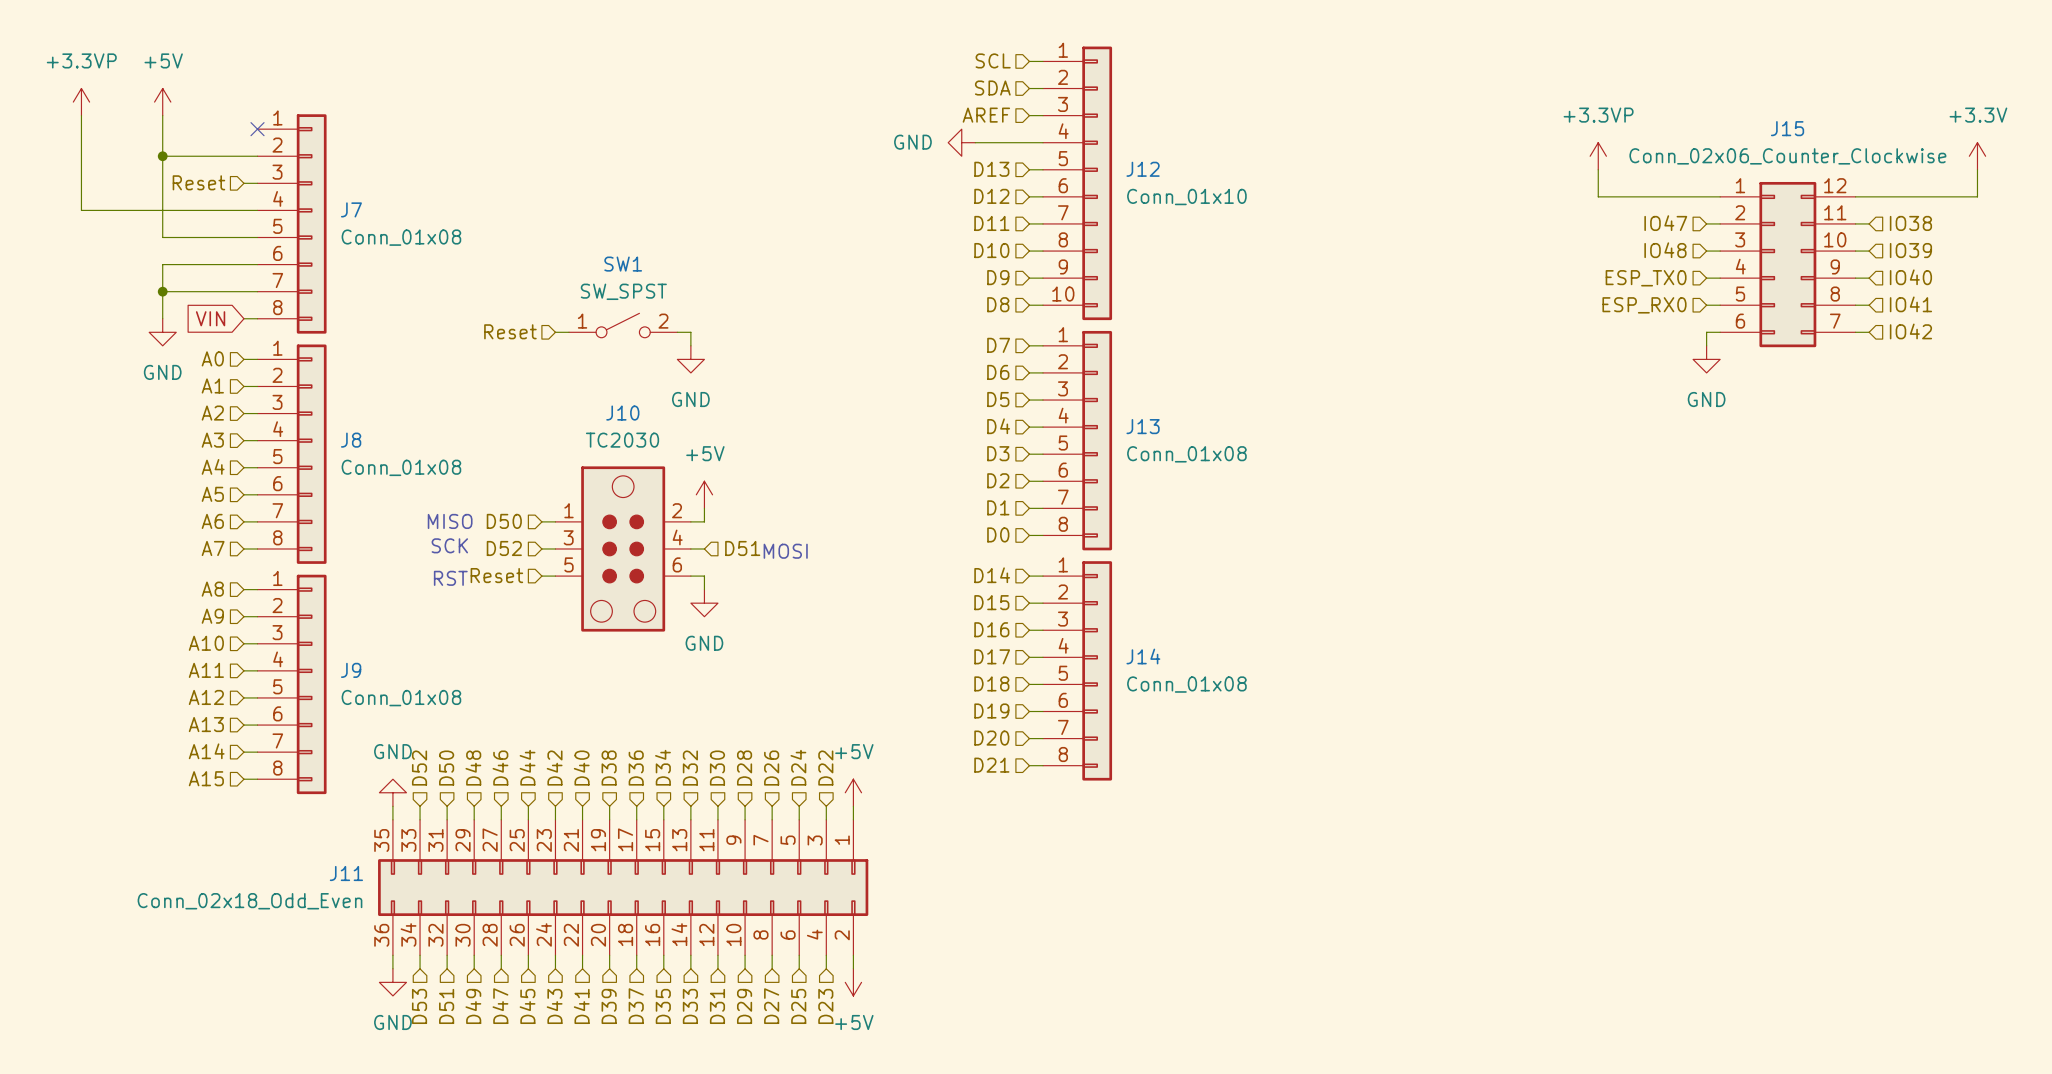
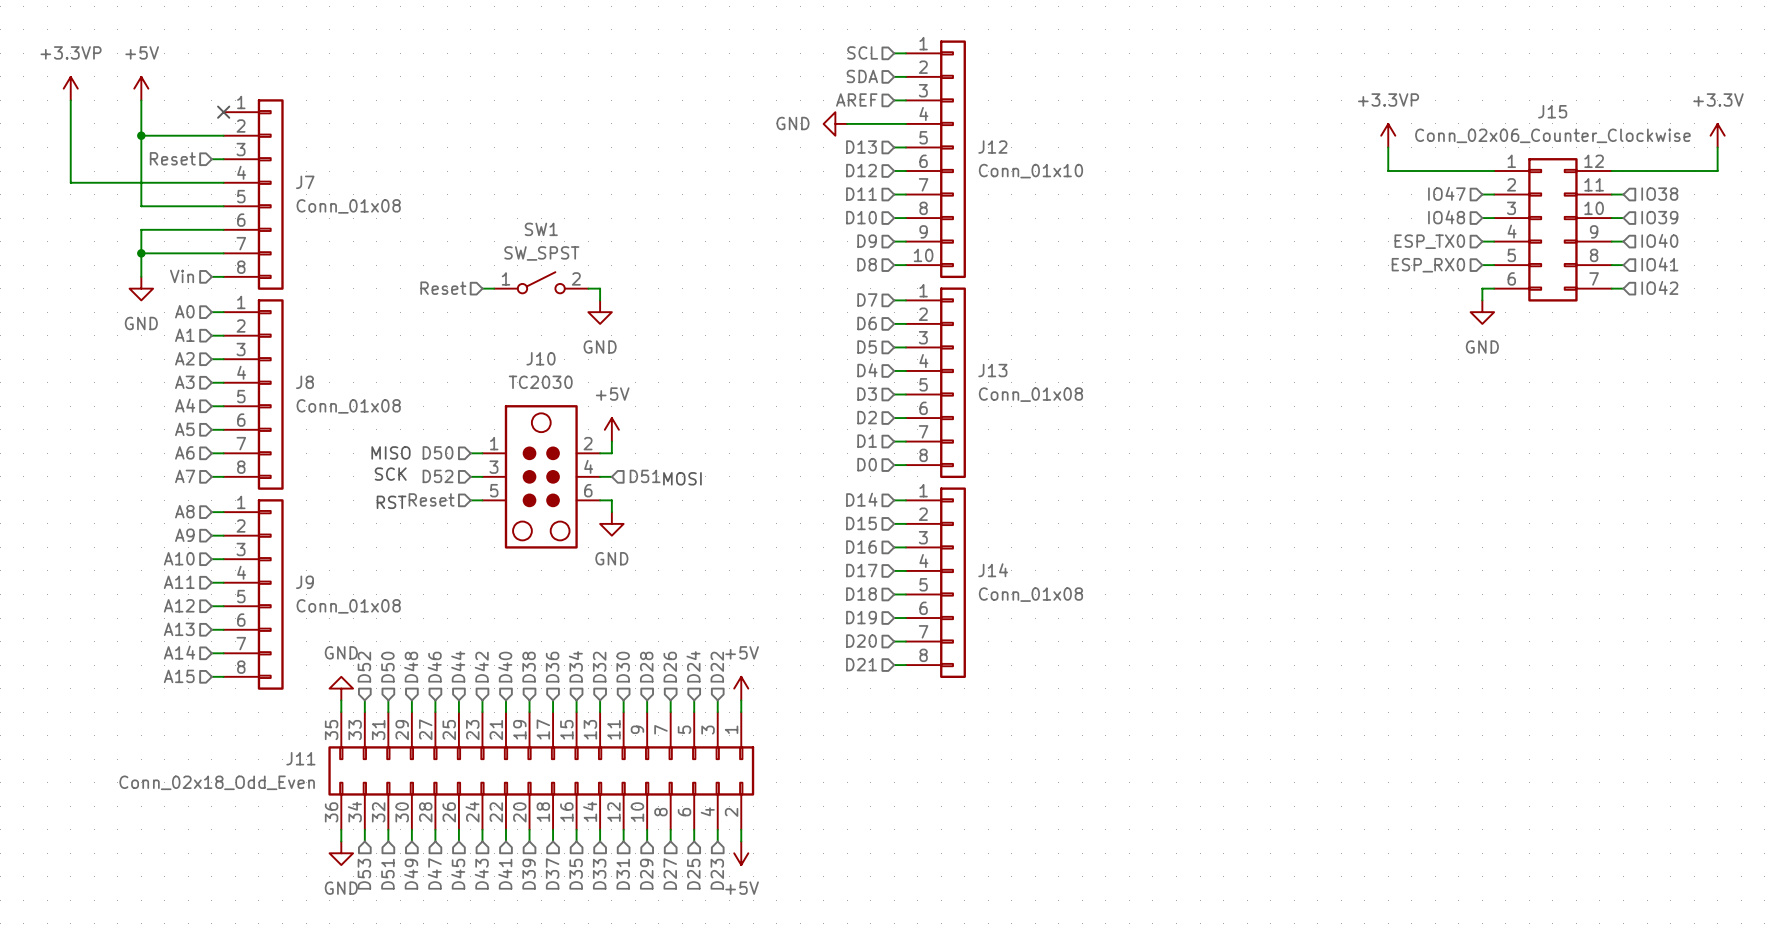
hierarchical label: none -> Vin (182, 276)
global label: VIN (210, 318) -> none

